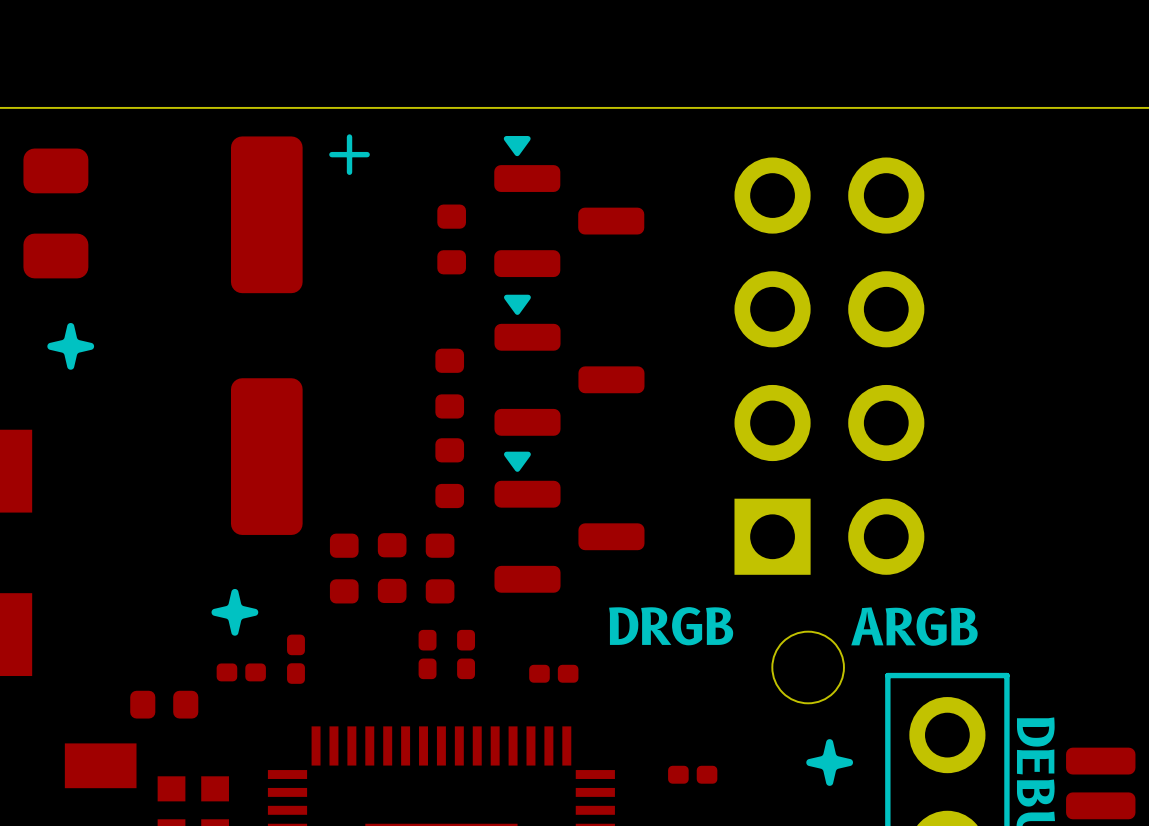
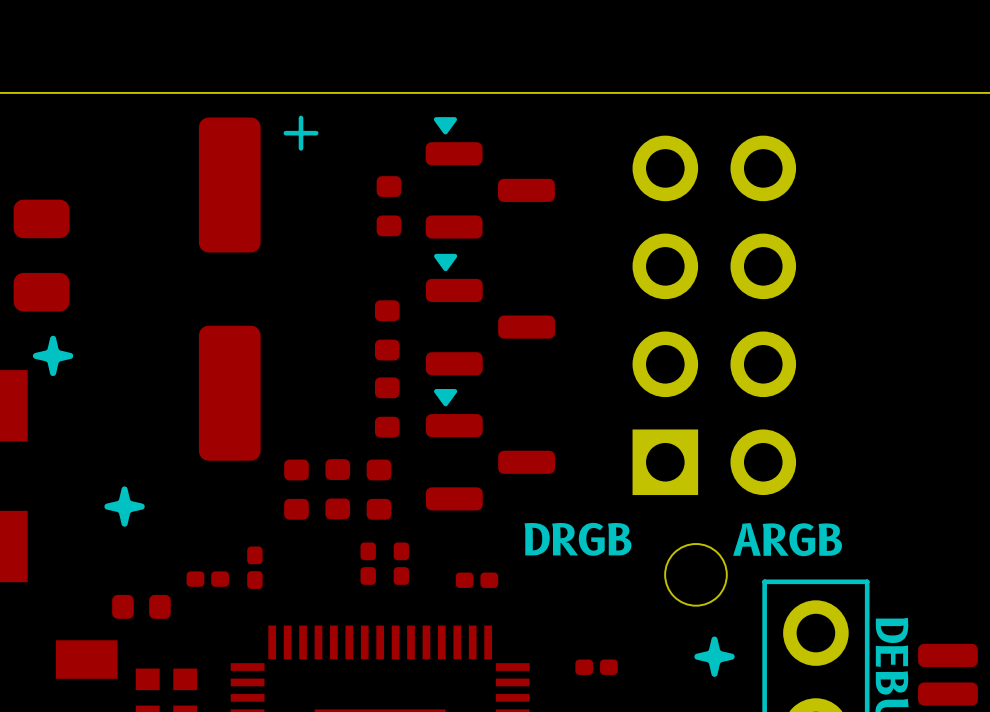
part position: (55, 213) -> (41, 255)
drawing position: (70, 346) -> (53, 355)
drawing position: (234, 612) -> (124, 506)

